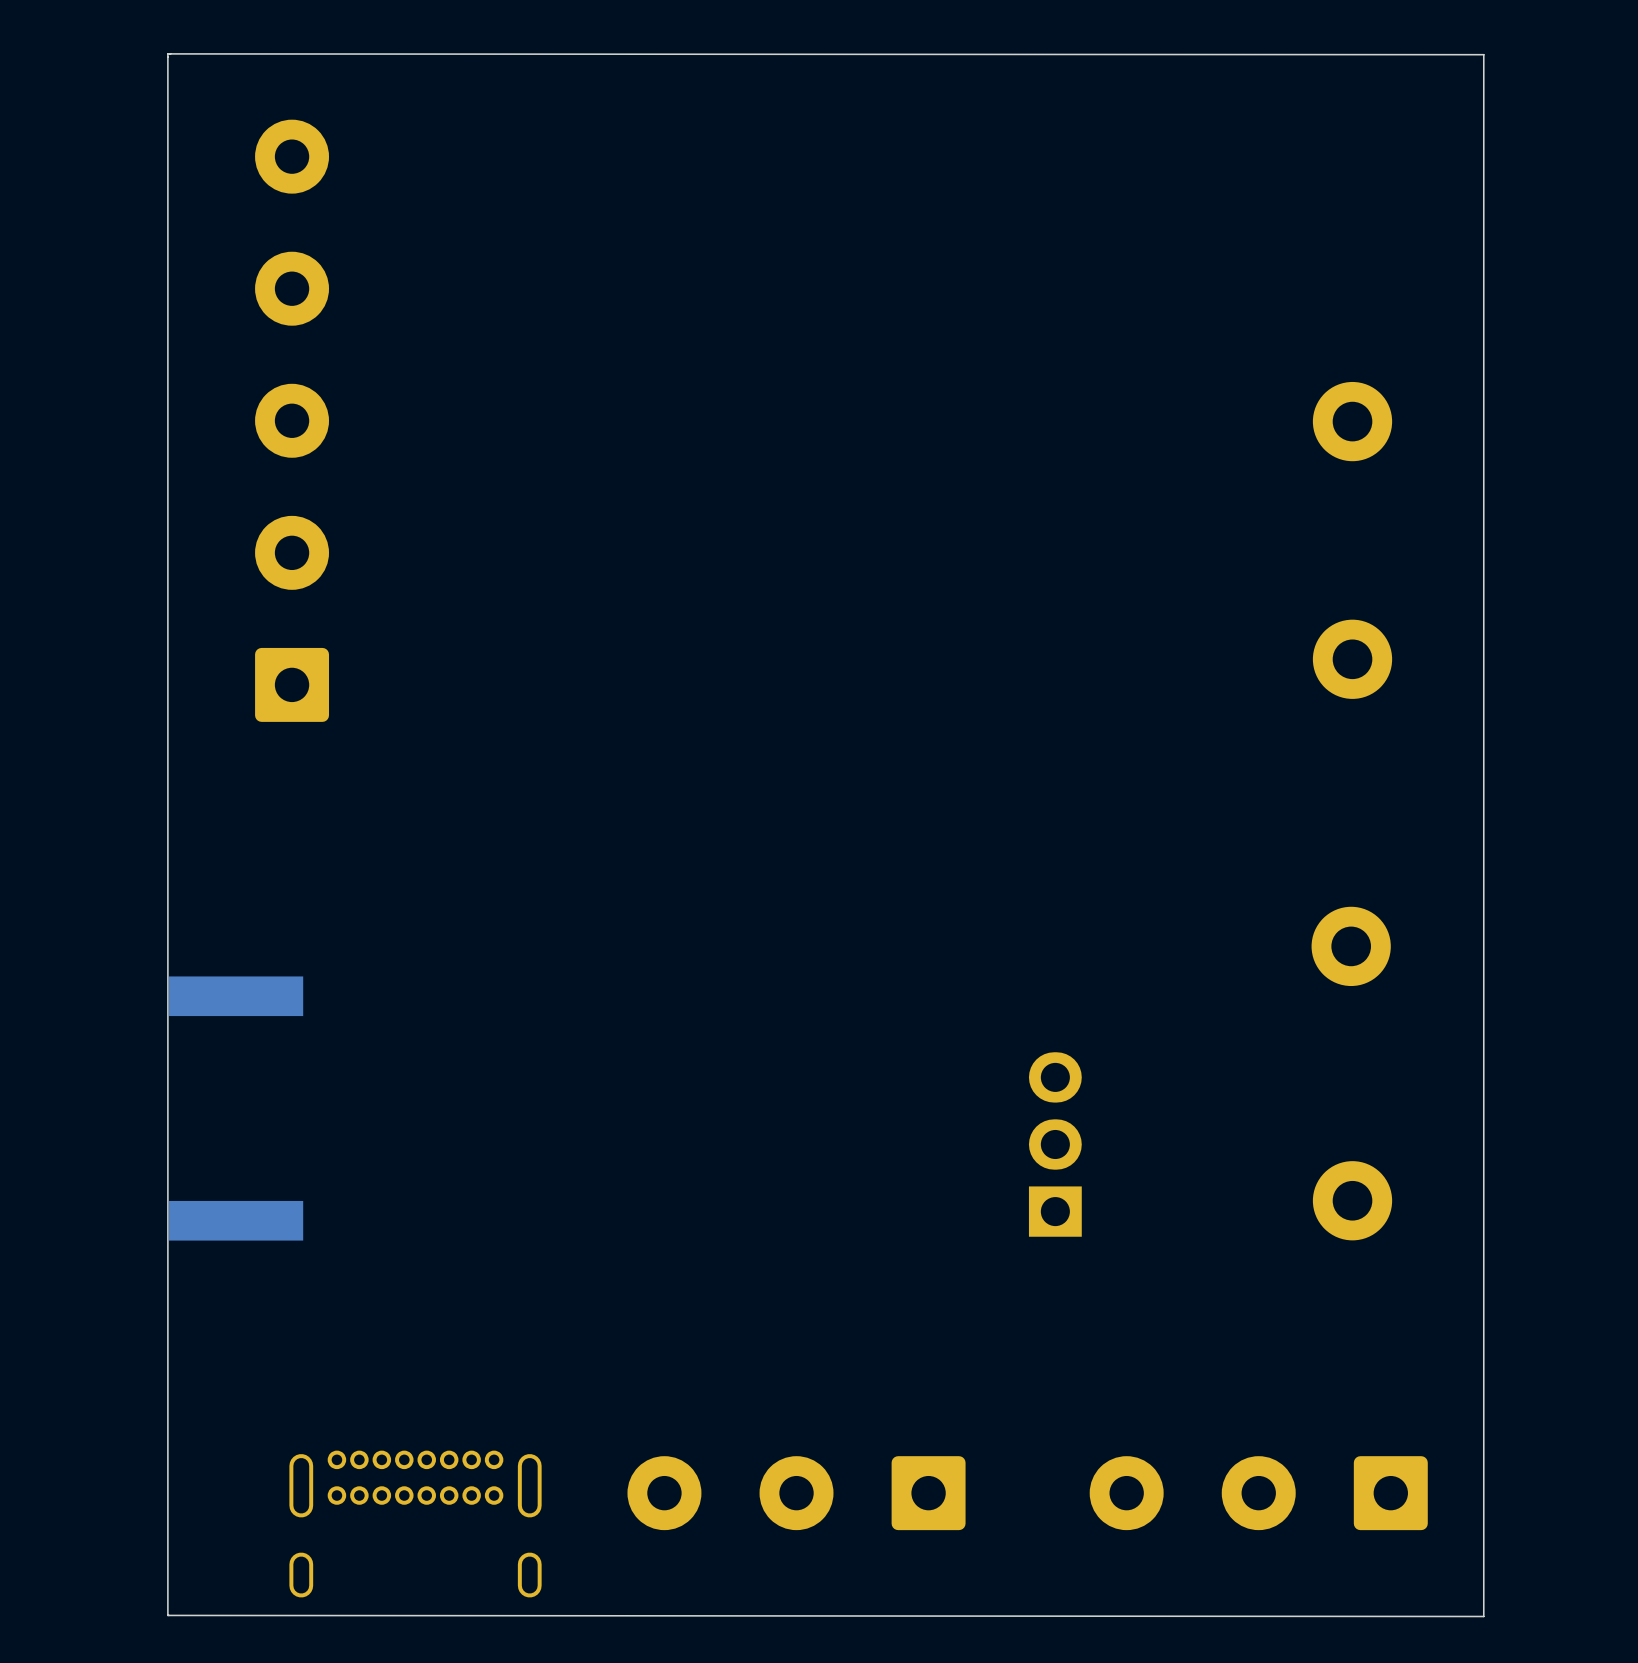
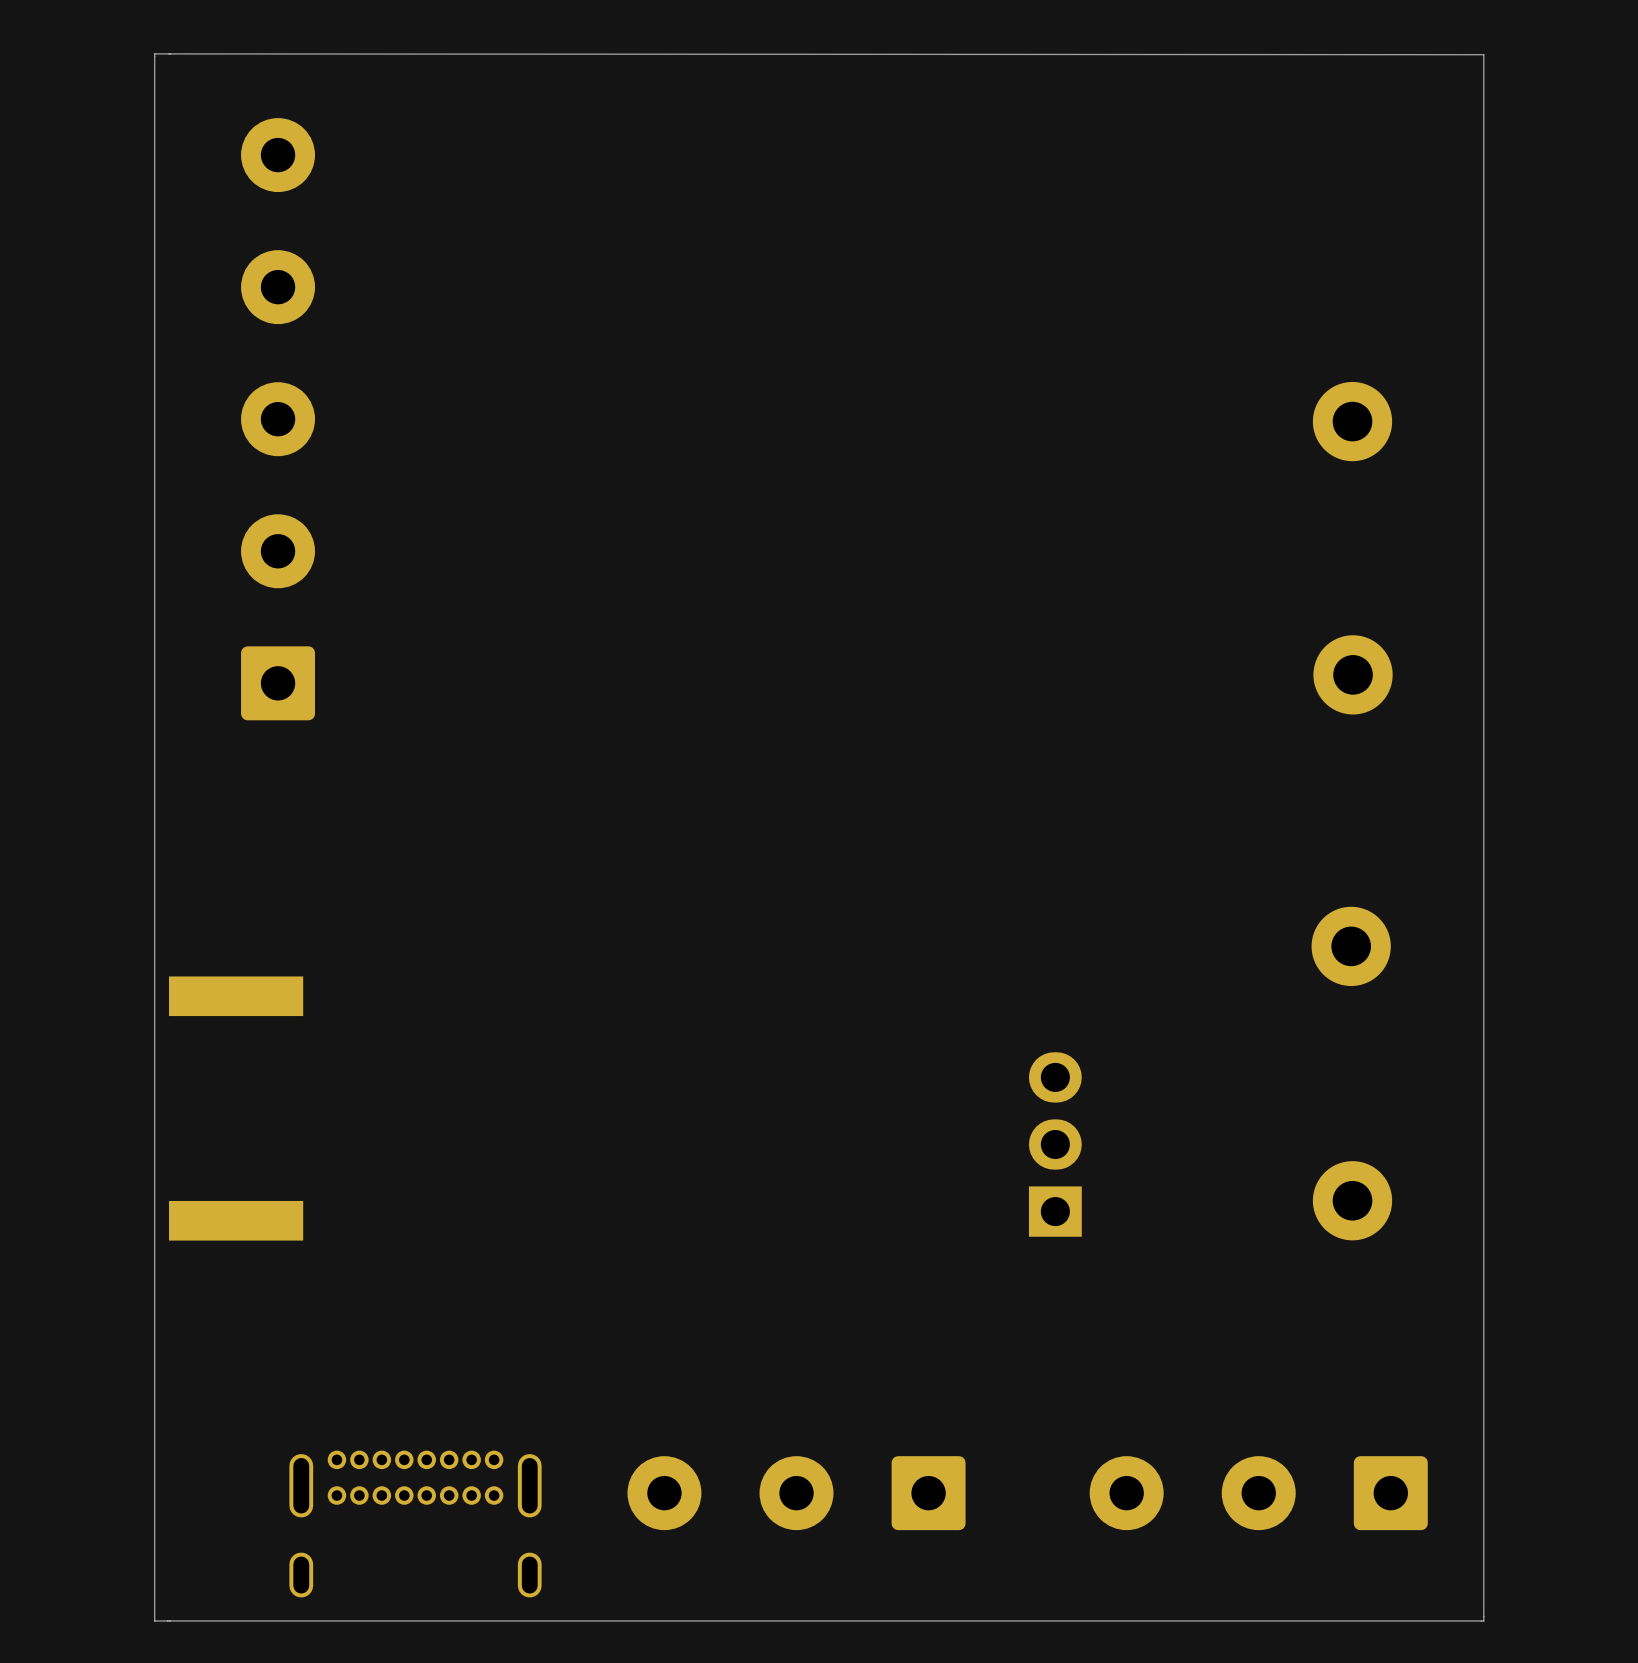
board edge: (169, 53) (167, 1615) (1483, 1616) -> (169, 53) (154, 53) (154, 1620) (1483, 1620) (1483, 1616)
part position: (292, 420) -> (278, 419)
part position: (1352, 659) -> (1353, 674)

